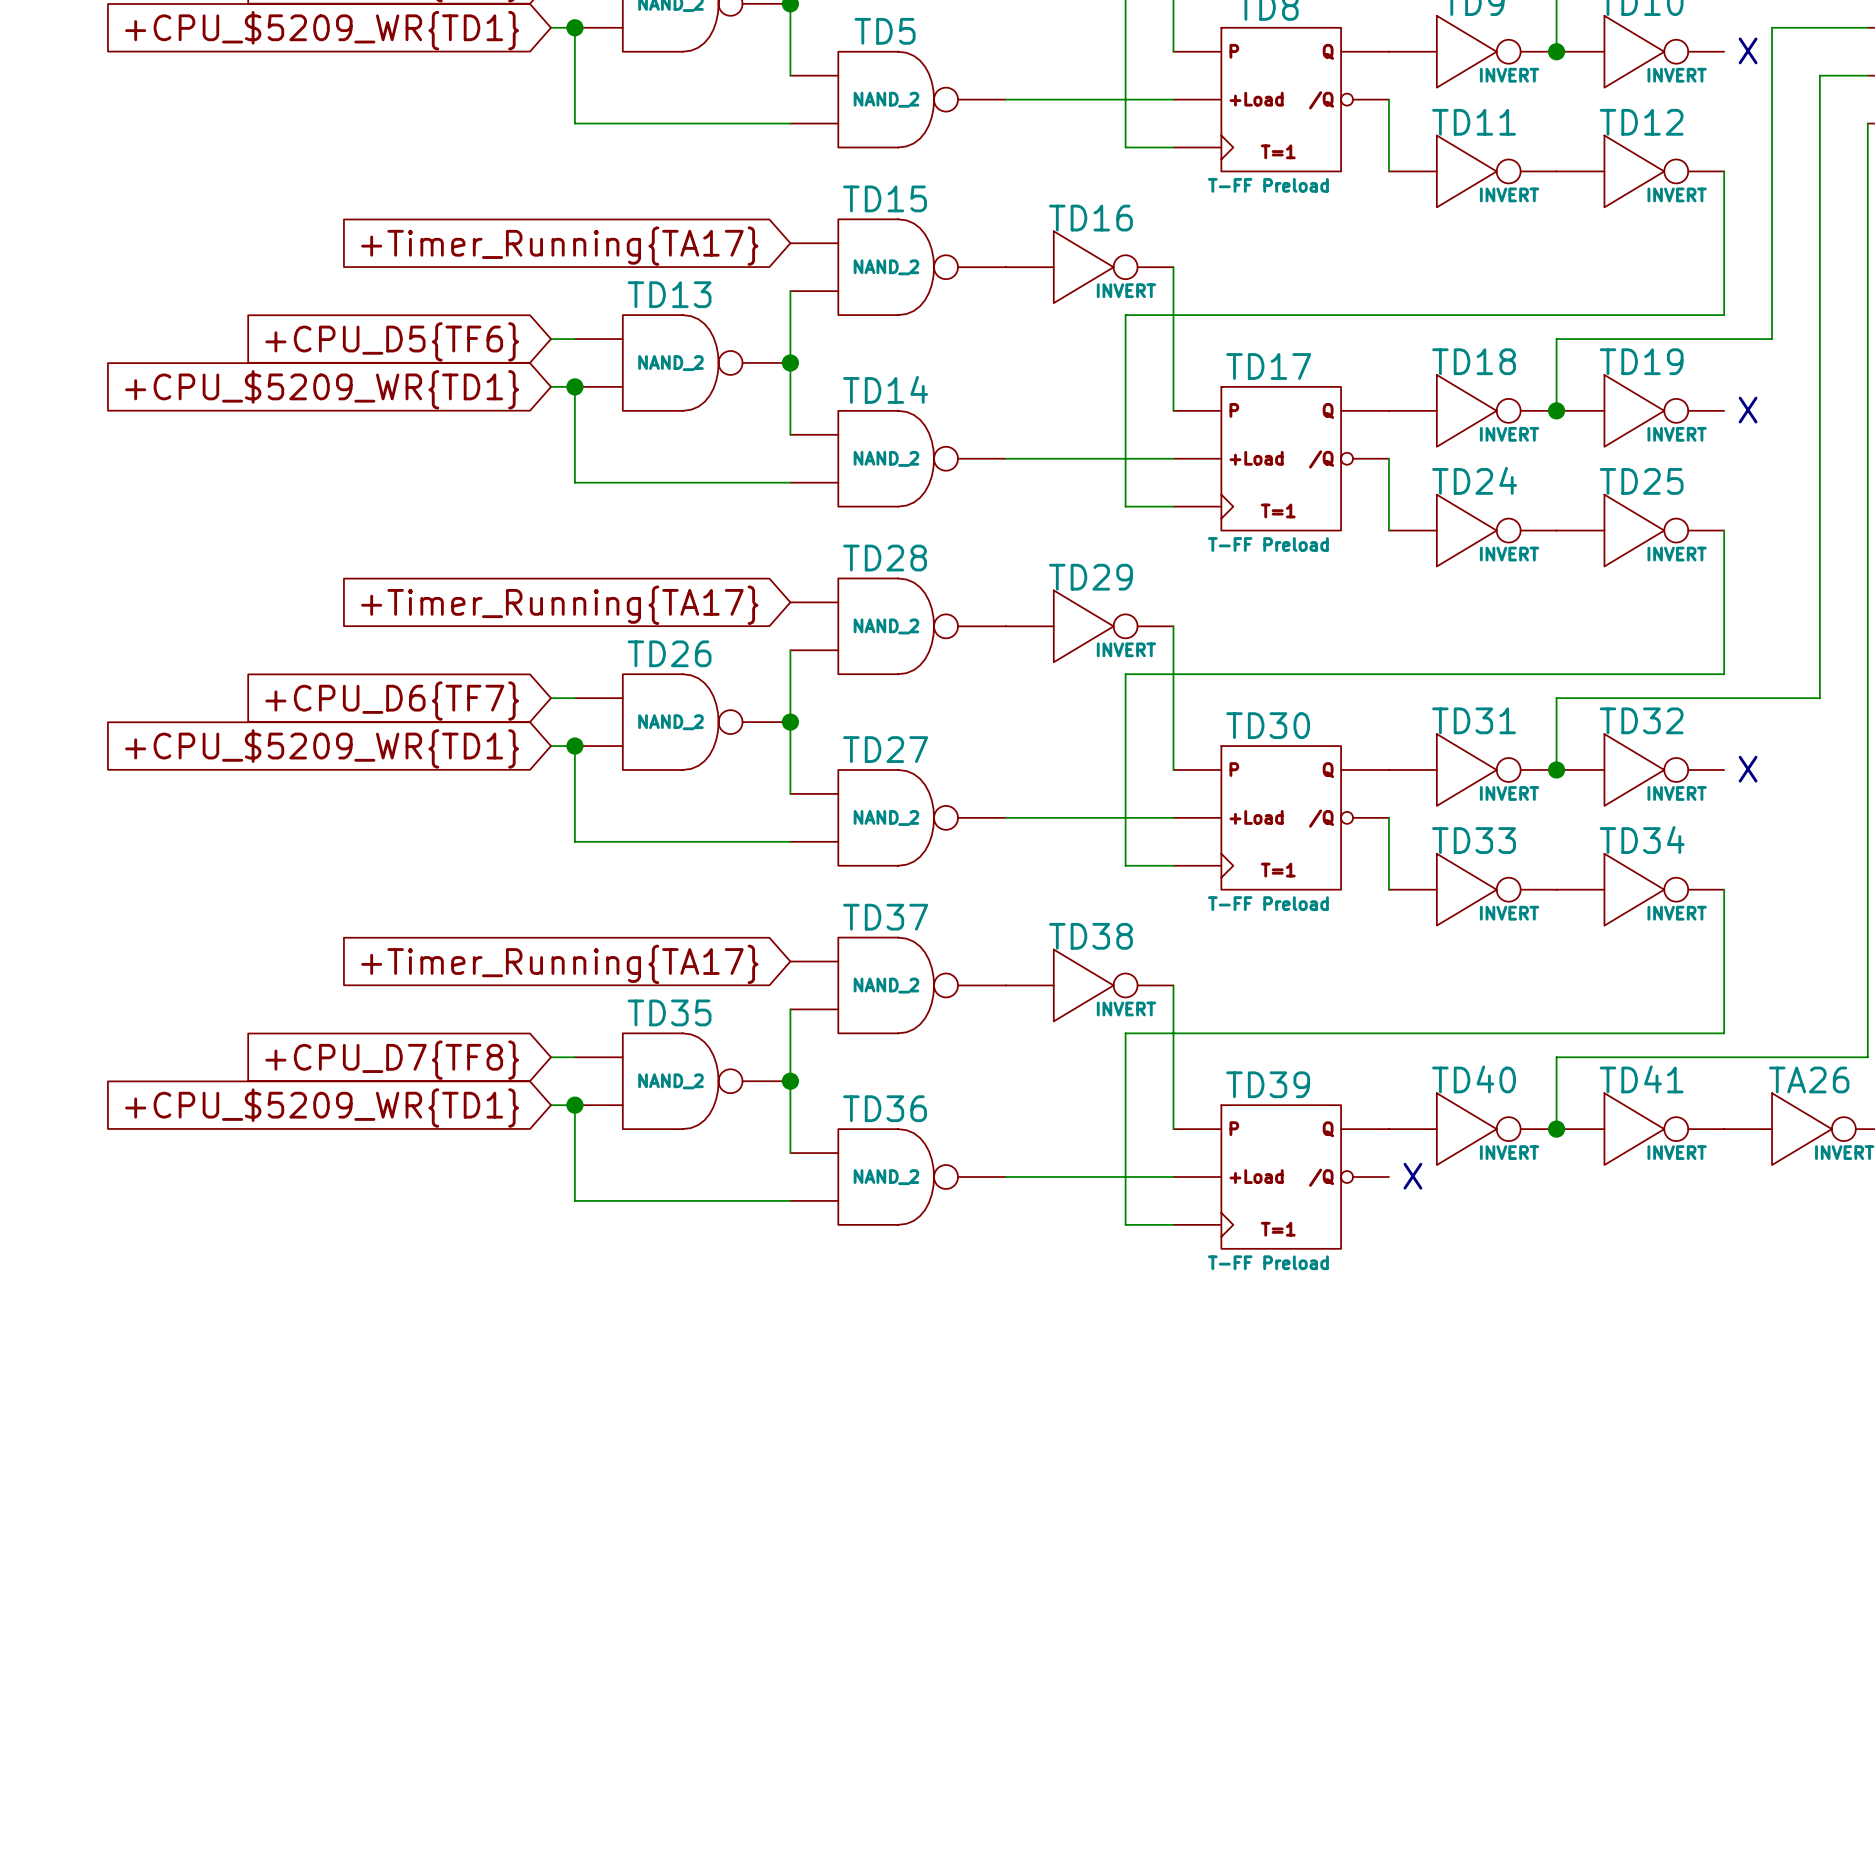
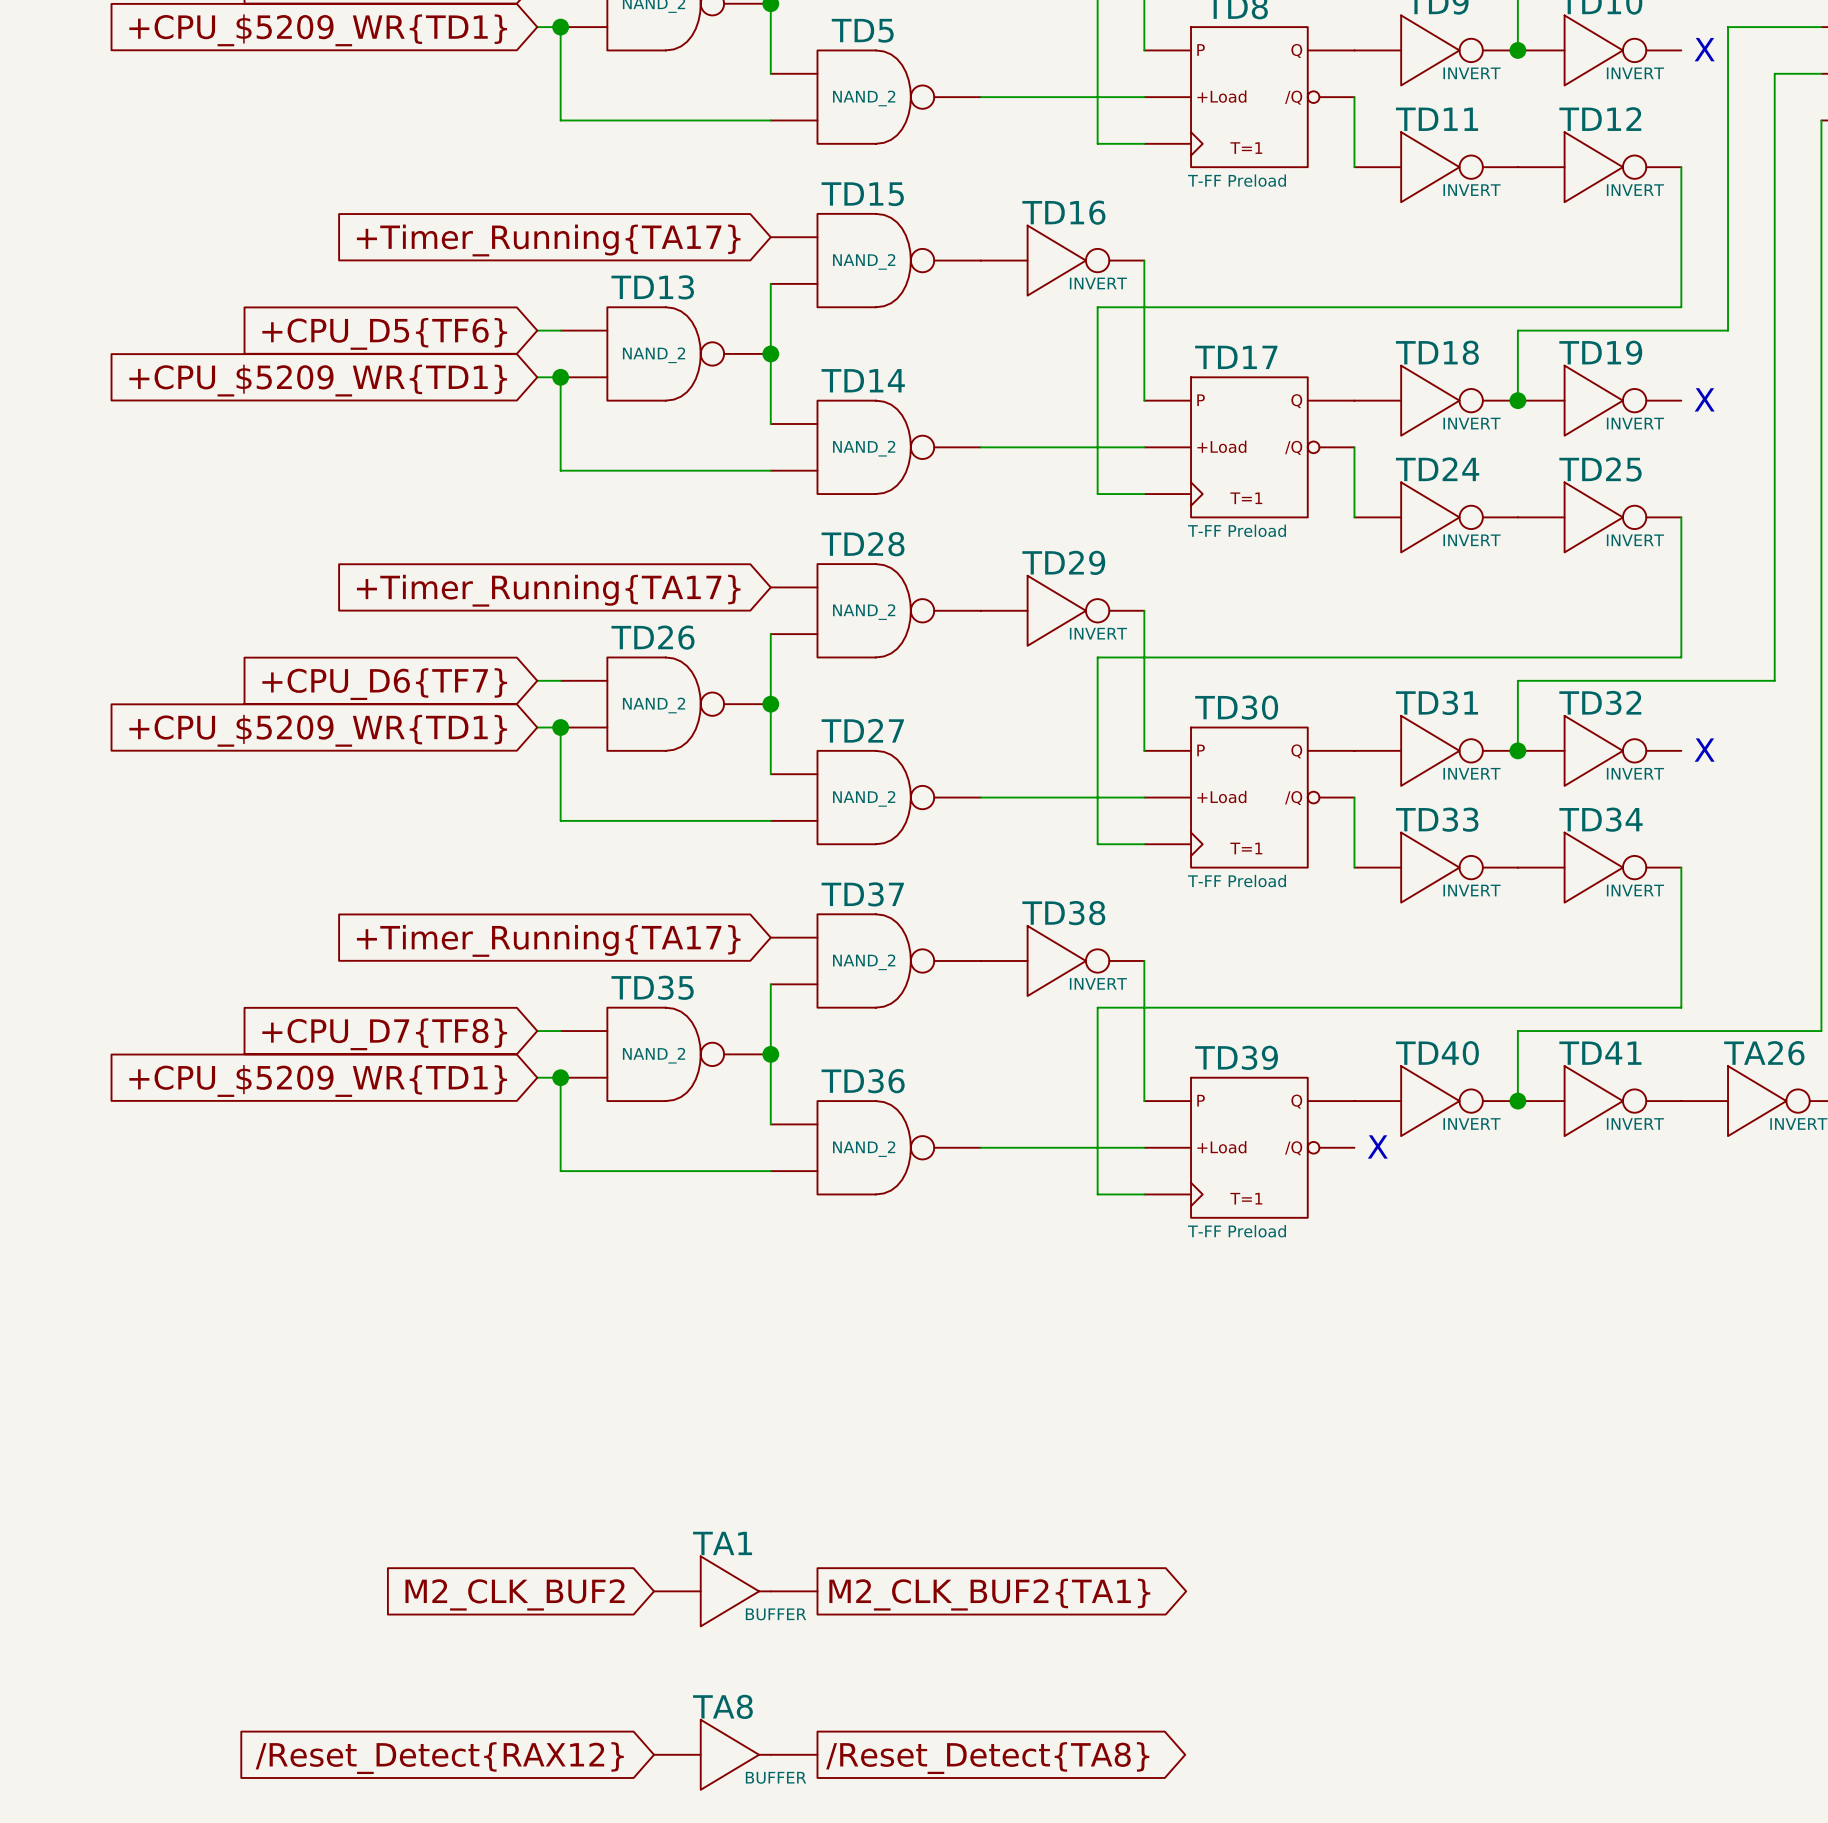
TA1: none -> BUFFER (735, 1591)
global label: none -> M2_CLK_BUF2 (515, 1594)
global label: none -> M2_CLK_BUF2{TA1} (989, 1594)
TA8: none -> BUFFER (735, 1754)
global label: none -> /Reset_Detect{RAX12} (439, 1758)
global label: none -> /Reset_Detect{TA8} (987, 1758)

